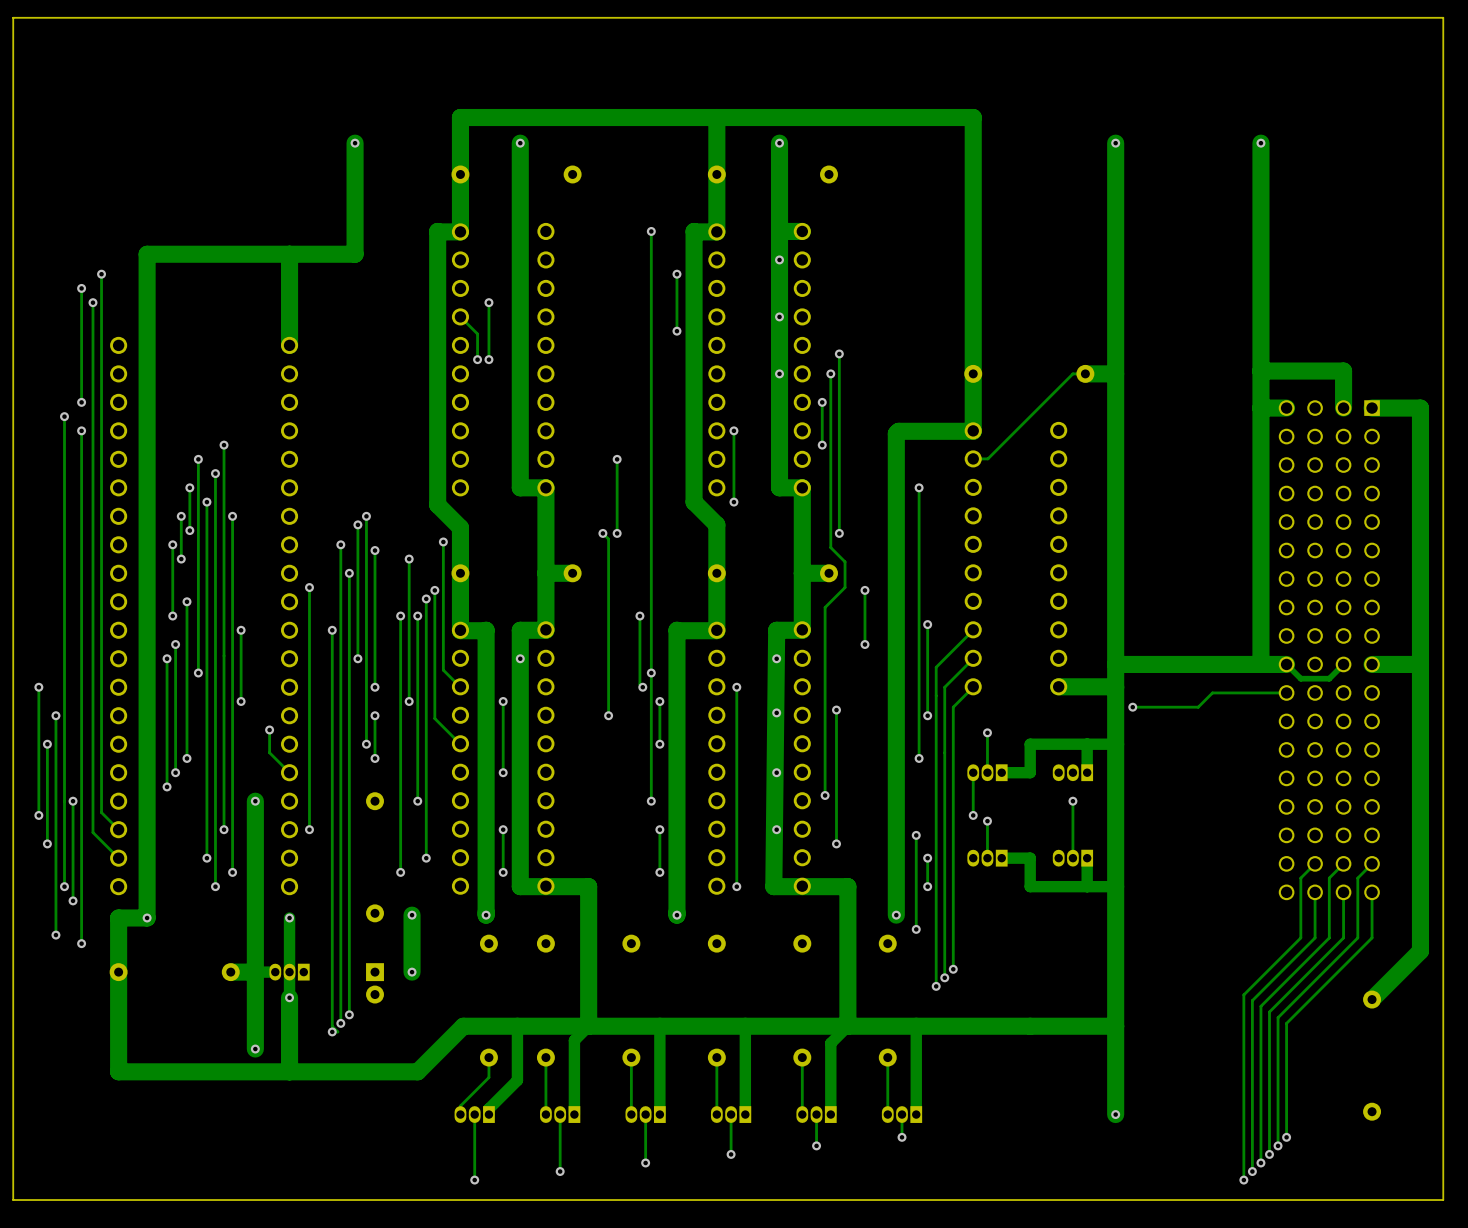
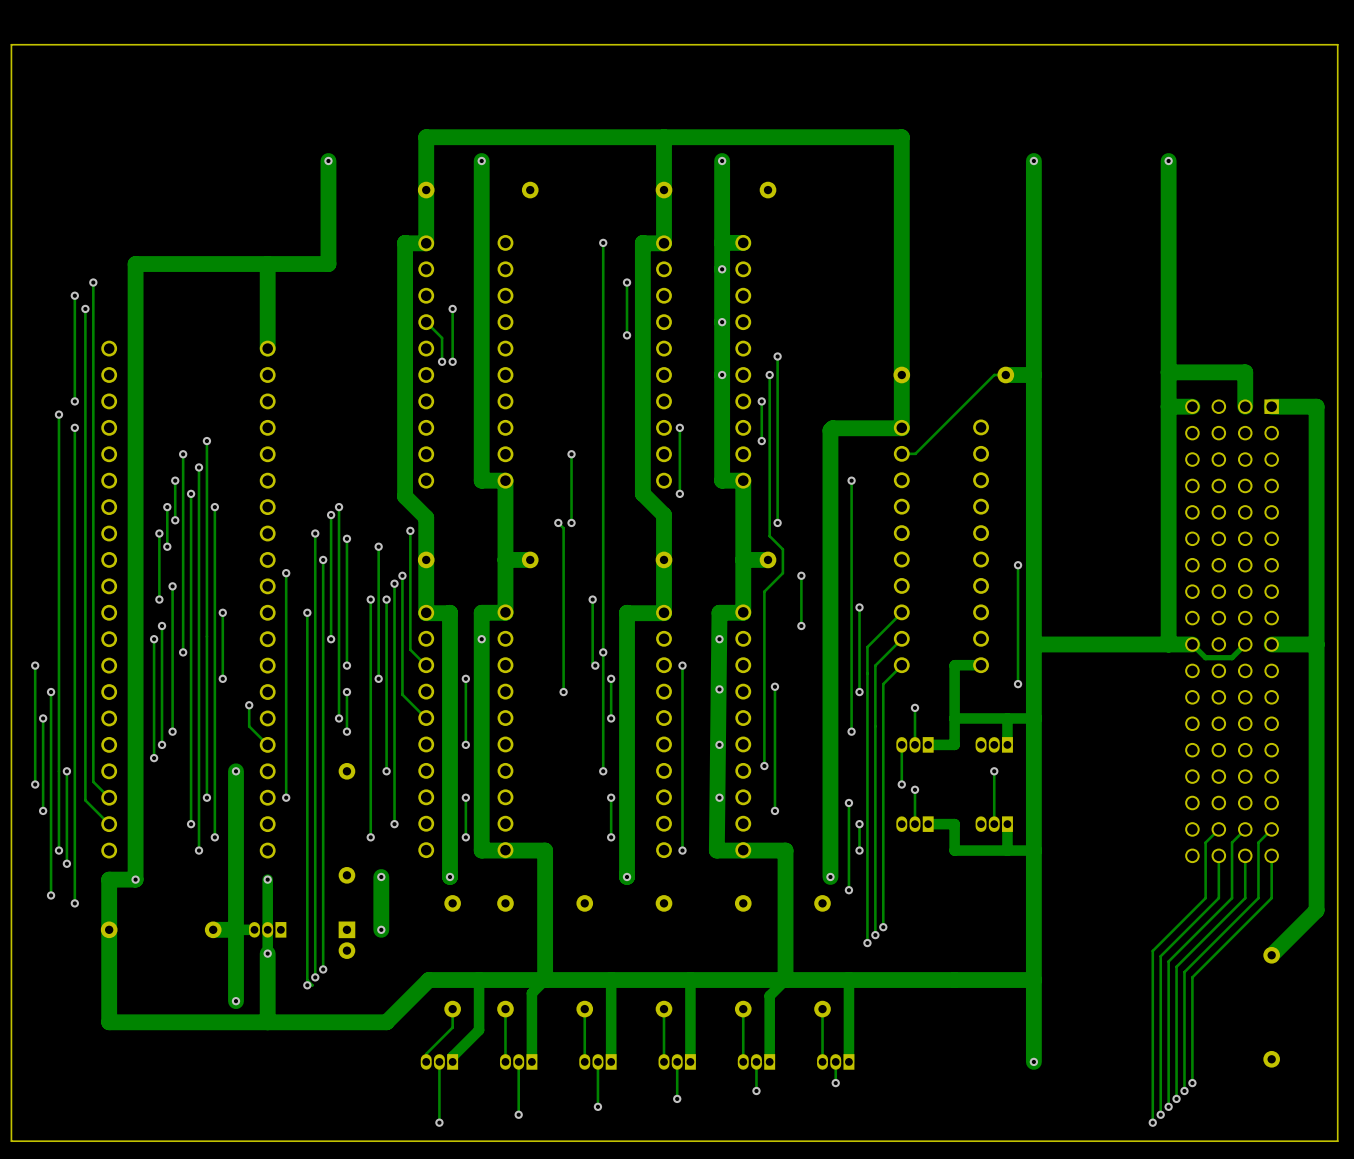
track: none -> (1018, 565) (1018, 684)
via: none -> (1018, 565)
track: (1058, 686) (1115, 687) -> (981, 665) (954, 665) (954, 718)
track: (1286, 692) (1212, 692) (1198, 707) (1132, 707) -> none
via position: (1132, 707) -> (1018, 684)

